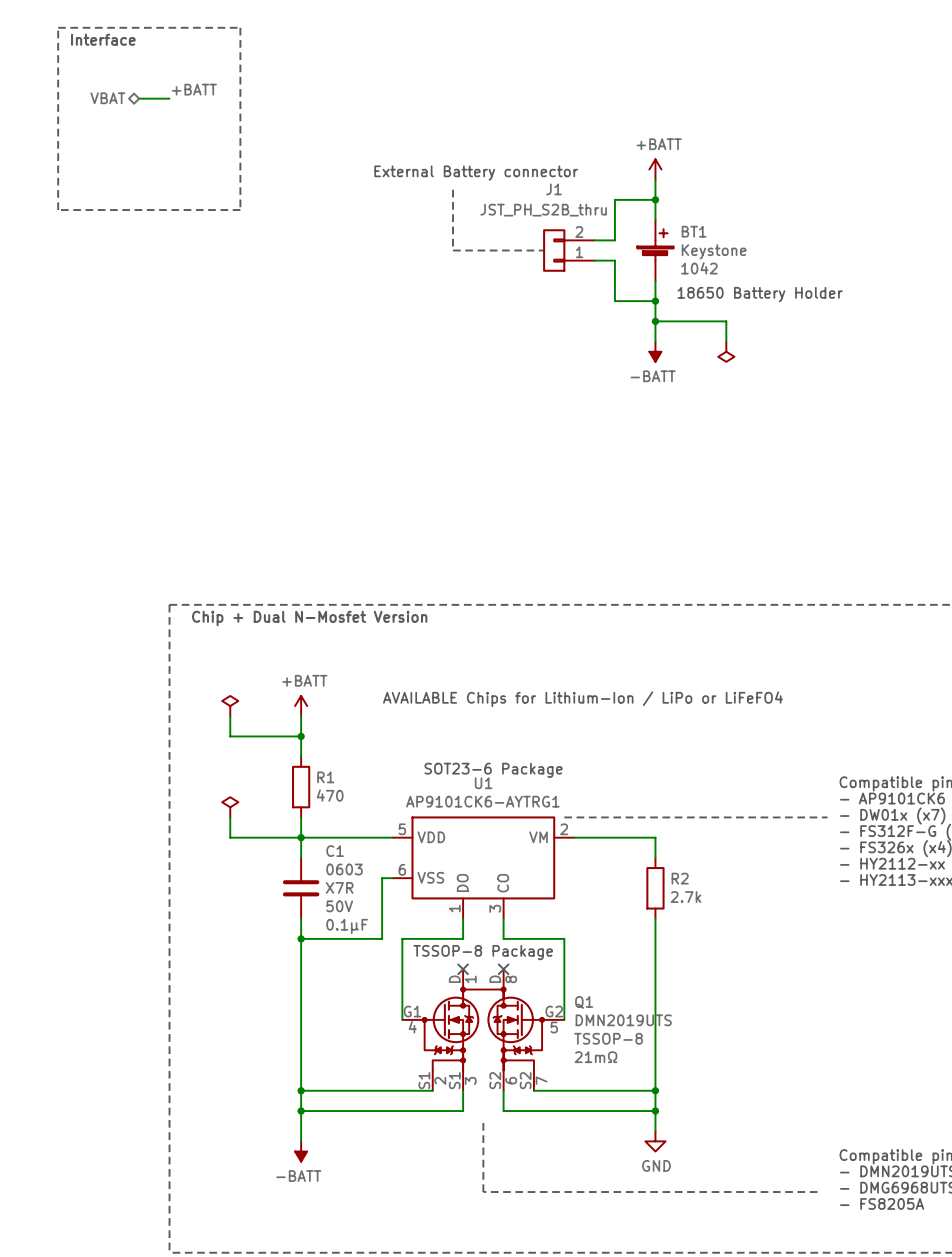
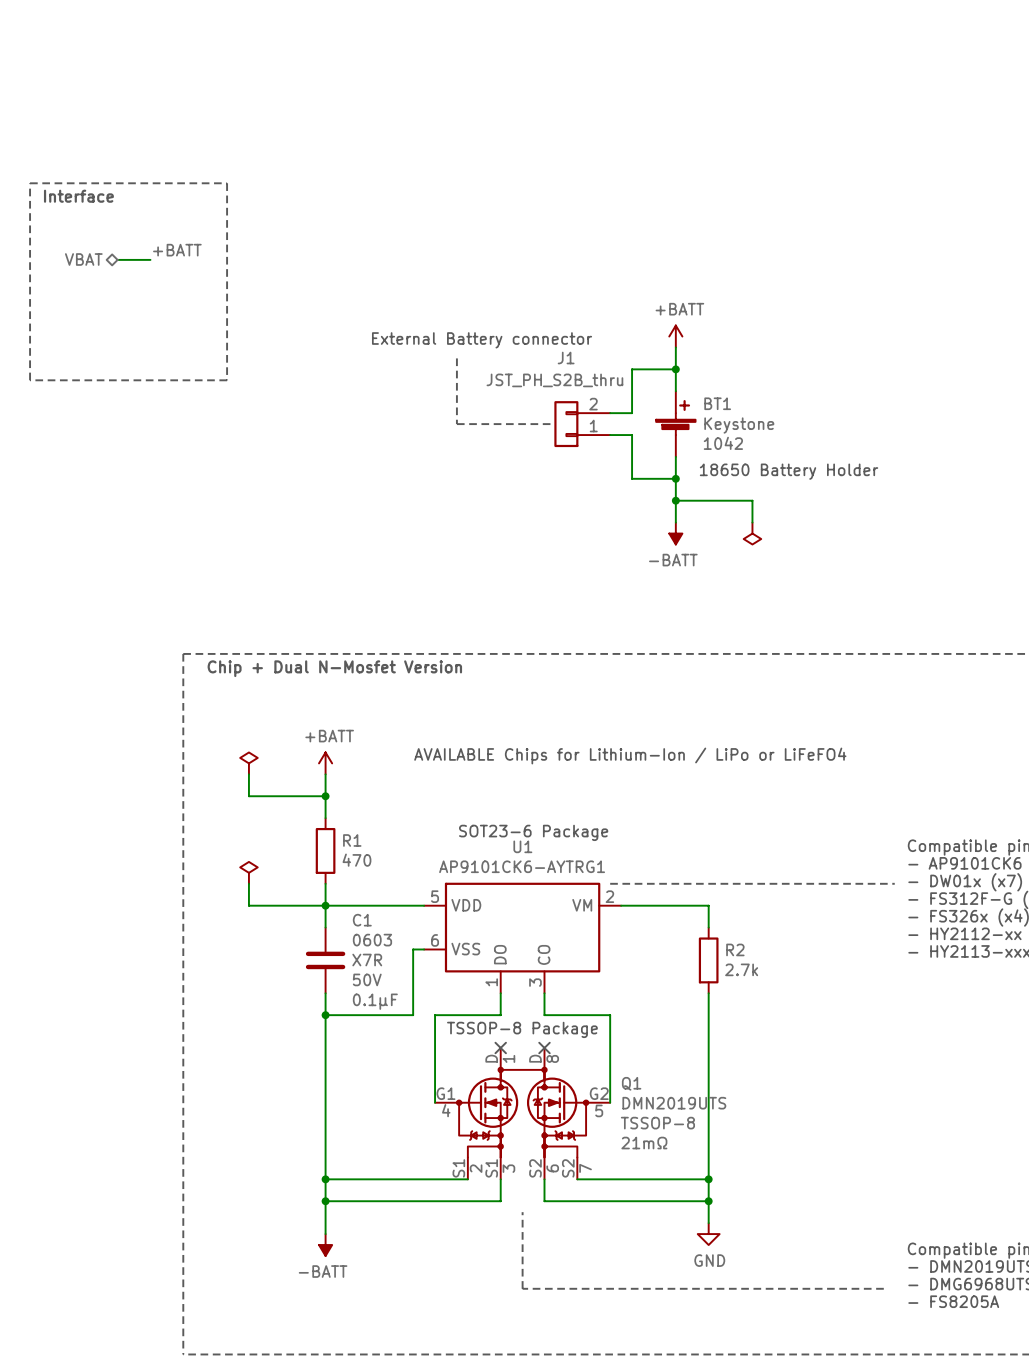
line: (58, 27) (240, 27) (240, 210) (58, 210) (58, 27) -> (30, 183) (227, 183) (227, 380) (30, 380) (30, 183)
text position: Interface (103, 39) -> Interface (78, 196)
label position: +BATT (194, 89) -> +BATT (177, 250)
hierarchical label position: VBAT (107, 98) -> VBAT (83, 259)
wire: (139, 98) (169, 98) -> (117, 259) (150, 259)
power symbol position: +BATT (655, 169) -> +BATT (675, 336)
text position: External Battery connector (476, 173) -> External Battery connector (482, 340)
wire: (655, 179) (655, 220) -> (675, 347) (675, 391)
line: (452, 189) (452, 250) (544, 250) -> (456, 358) (456, 424) (555, 424)
wire: (655, 199) (614, 199) (614, 240) (594, 240) -> (675, 369) (632, 369) (632, 413) (610, 413)
junction: (655, 199) -> none
J1 position: (568, 250) -> (582, 424)
BT1 position: (655, 250) -> (675, 424)
wire: (594, 260) (614, 260) (614, 301) (655, 301) -> (610, 435) (632, 435) (632, 478) (675, 478)
wire: (655, 280) (655, 341) -> (675, 456) (675, 522)
text position: 18650 Battery Holder (760, 294) -> 18650 Battery Holder (789, 471)
junction: (655, 301) -> none
wire: (655, 321) (726, 321) (726, 341) -> (675, 500) (752, 500) (752, 522)
junction: (655, 321) -> none
junction: none -> (675, 369)
power symbol position: -BATT (655, 351) -> -BATT (675, 533)
power symbol position: (726, 351) -> (752, 533)
junction: none -> (675, 478)
junction: none -> (675, 500)

